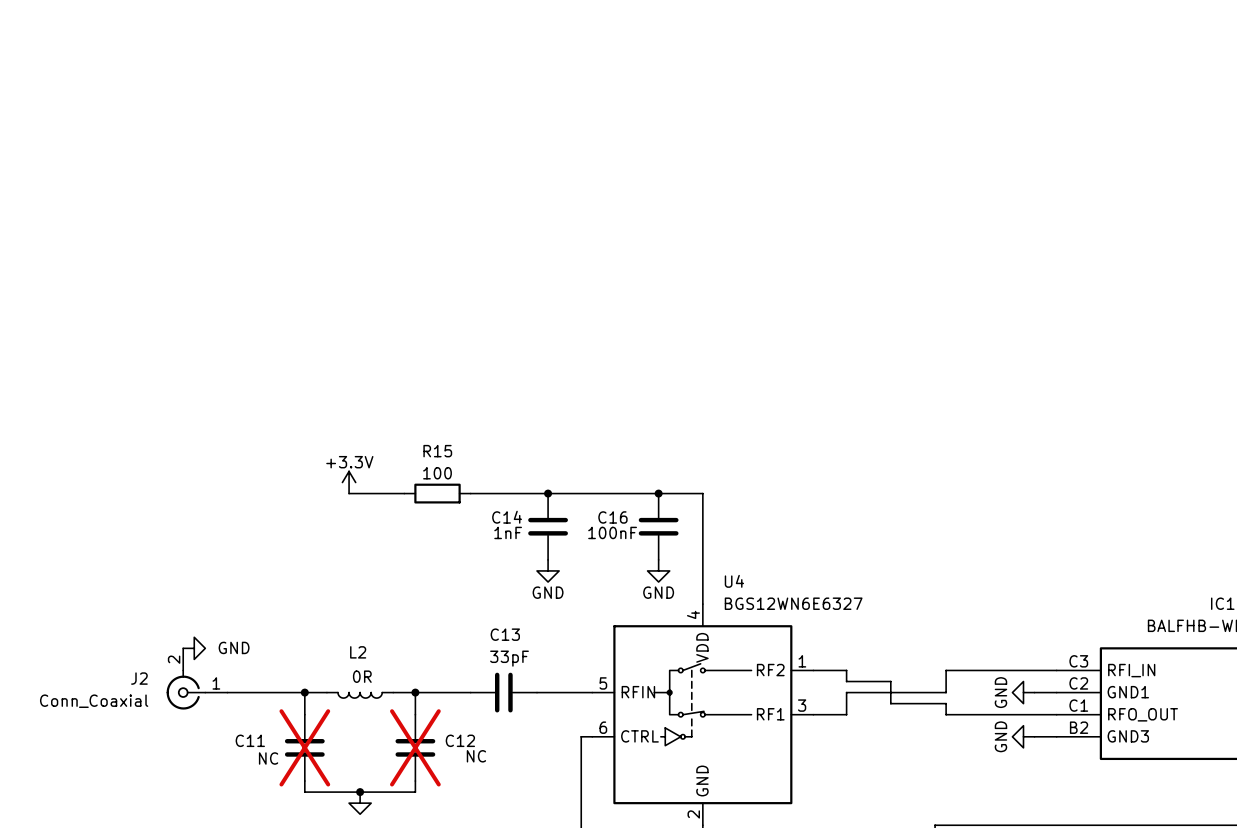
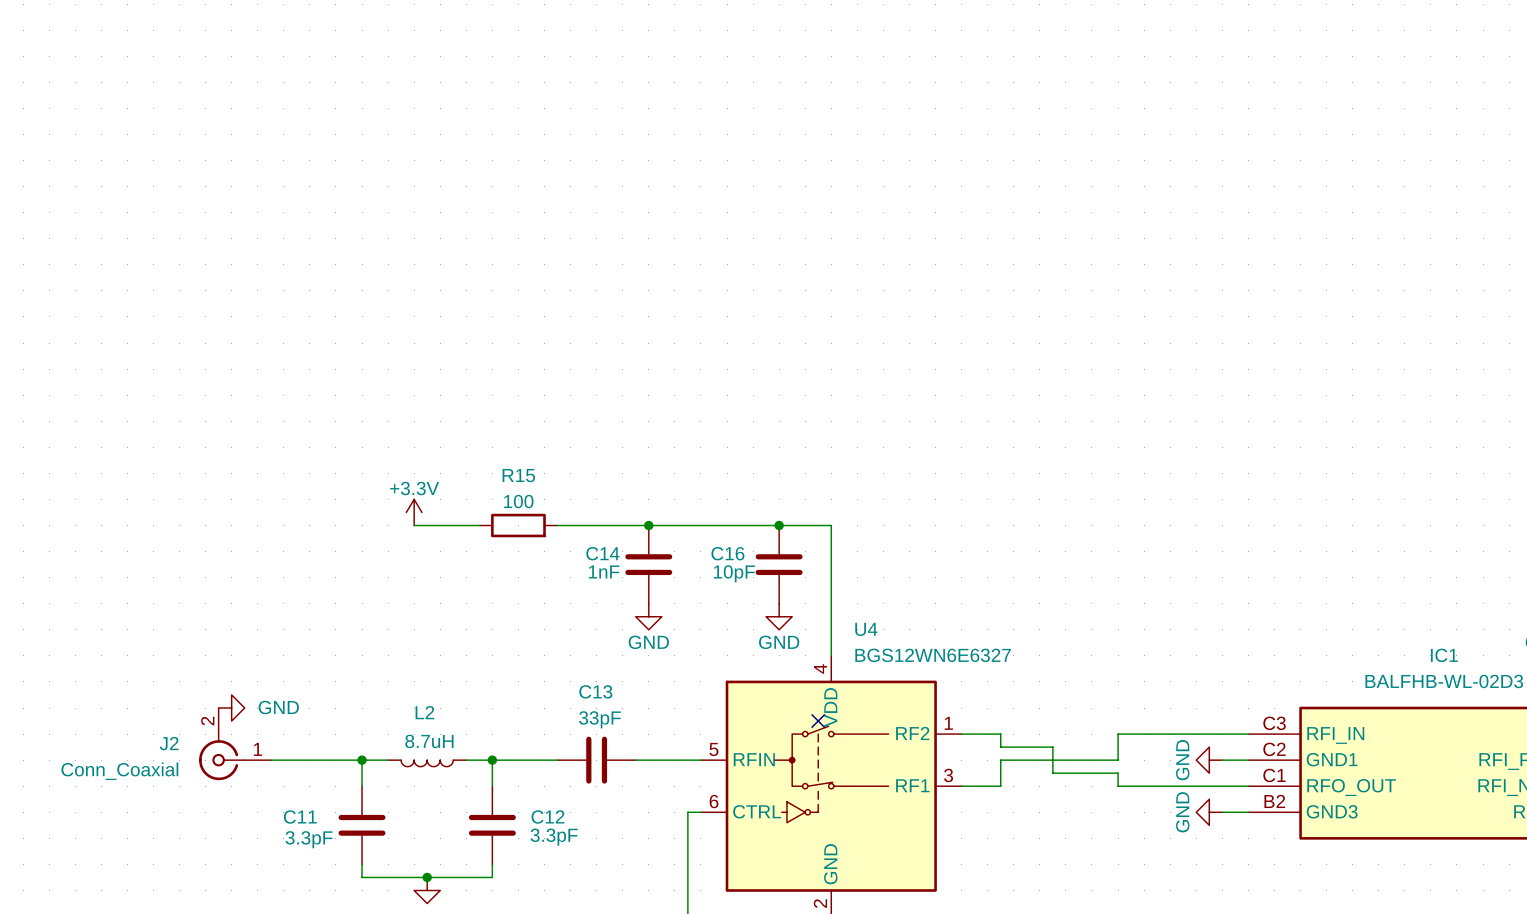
C16 value: 100nF (612, 532) -> 10pF (734, 573)
no-connect mark: none -> (818, 721)
L2 value: 0R (362, 676) -> 8.7uH (429, 741)
C11 do-not-place cross: (304, 747) -> none
C12 do-not-place cross: (415, 747) -> none
C12 value: NC (476, 756) -> 3.3pF (554, 837)
C11 value: NC (268, 758) -> 3.3pF (309, 839)

